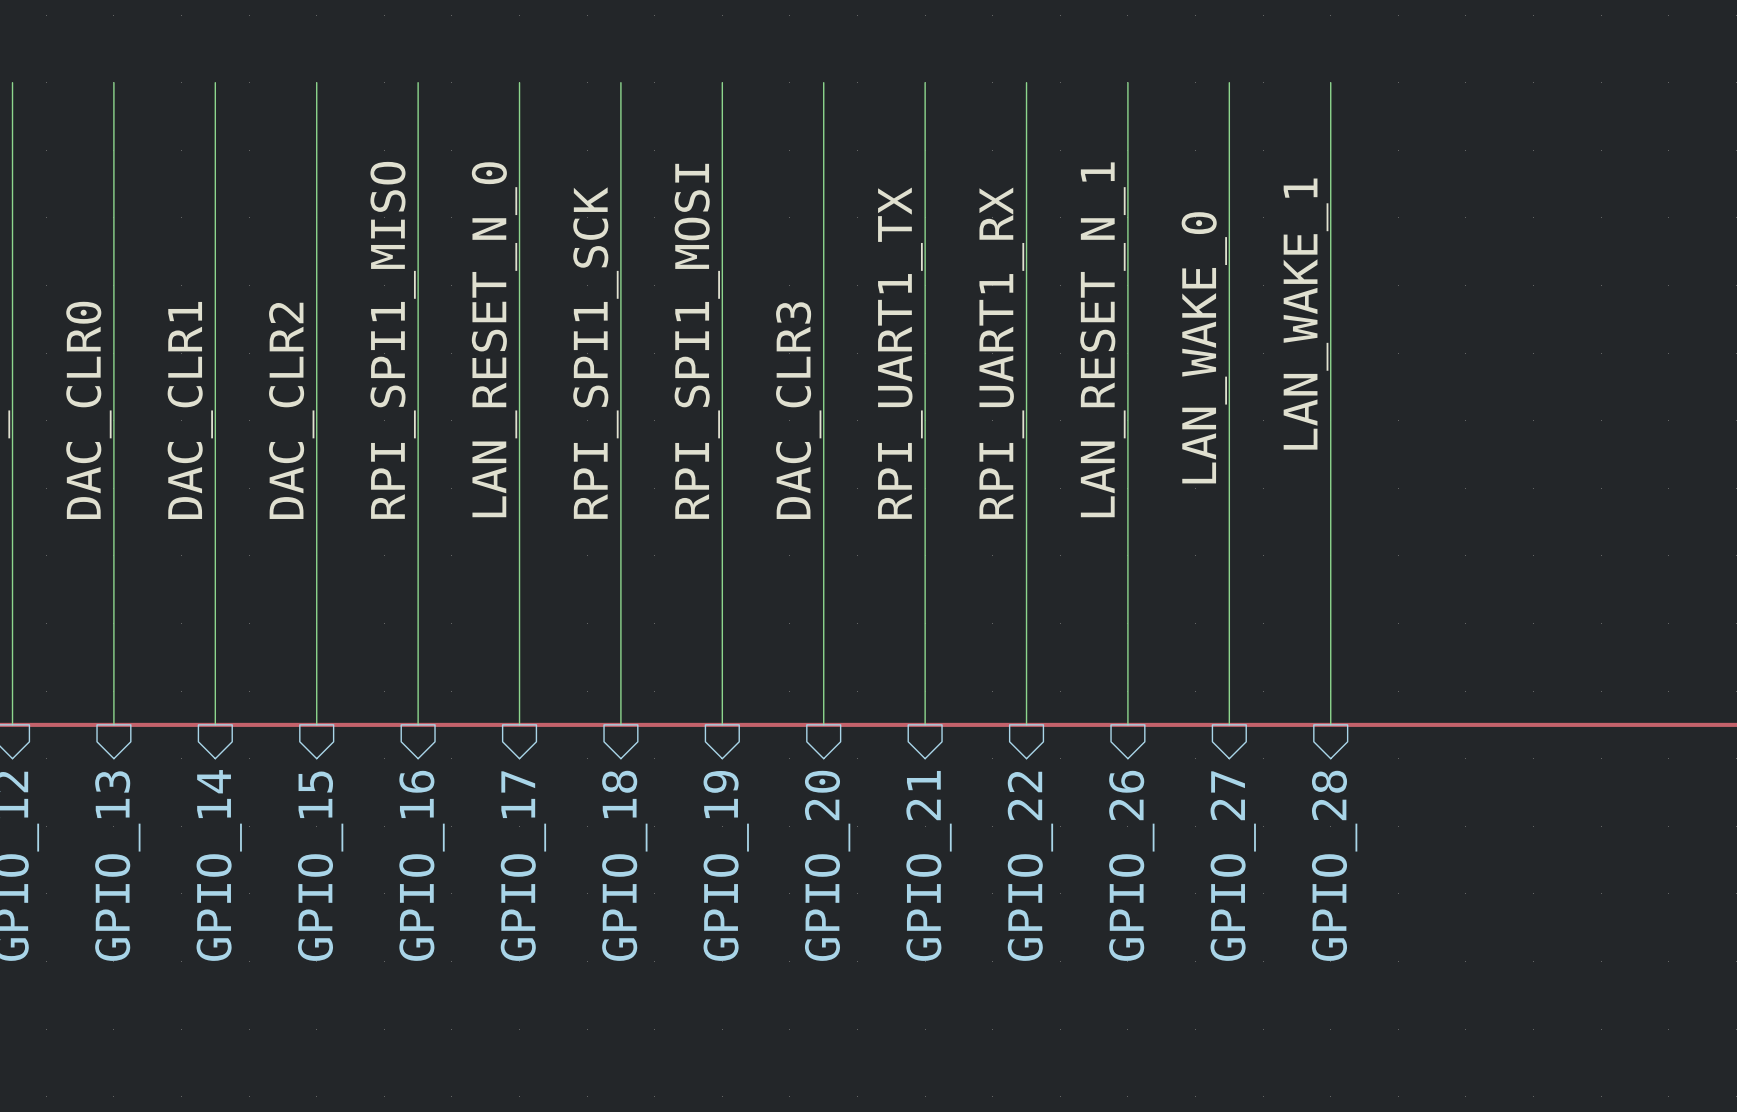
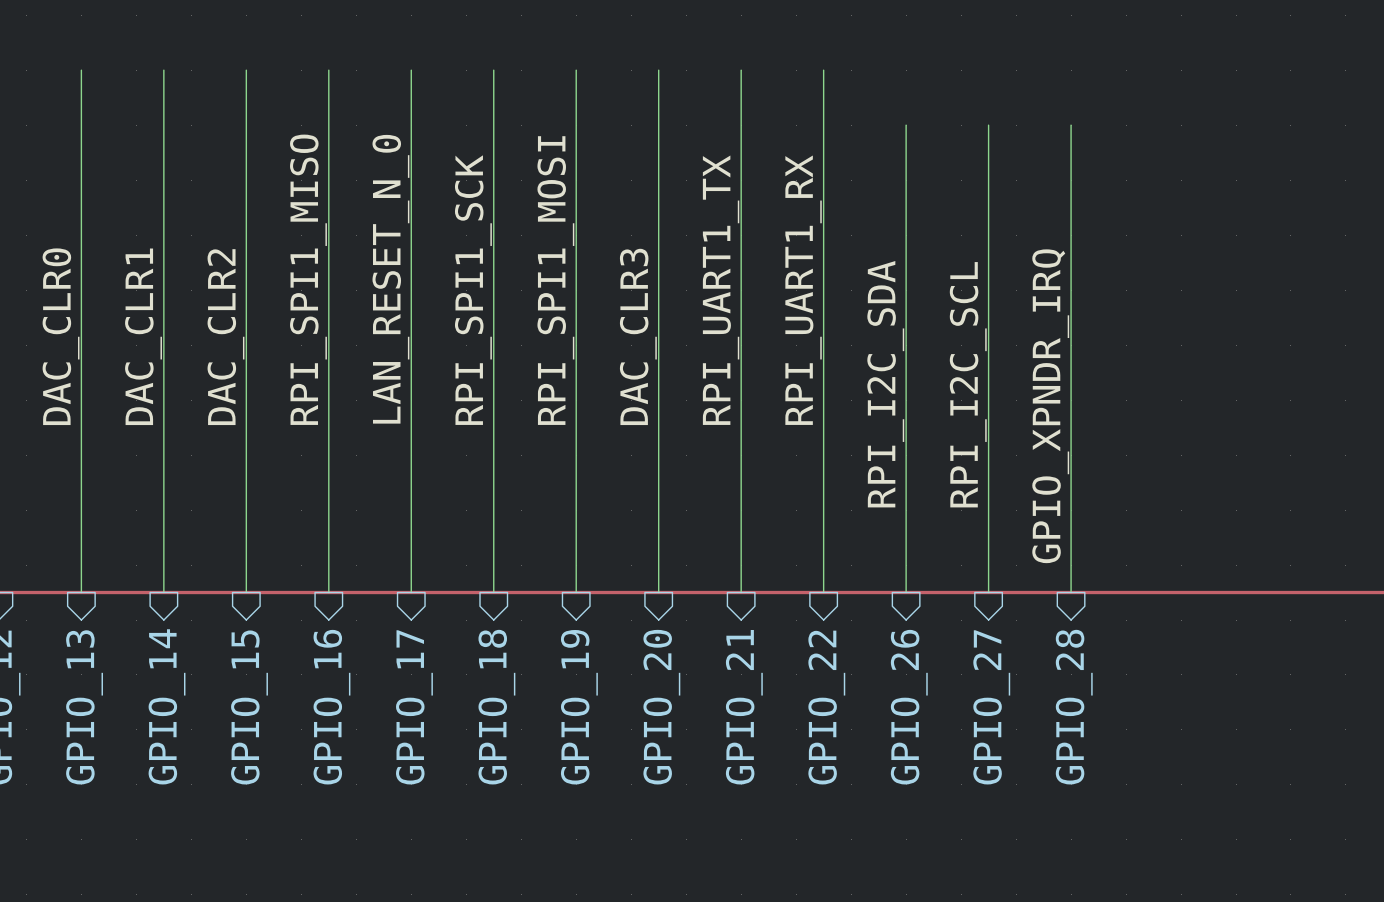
wire: (1127, 82) (1127, 150) -> none
wire: (1229, 82) (1229, 150) -> none
wire: (1330, 82) (1330, 150) -> none
label: LAN_WAKE_1 (1306, 314) -> none
label: LAN_RESET_N_1 (1102, 339) -> none
label: LAN_WAKE_0 (1204, 347) -> none
label: none -> RPI_I2C_SDA (885, 384)
label: none -> RPI_I2C_SCL (968, 384)
label: none -> GPIO_XPNDR_IRQ (1050, 406)

